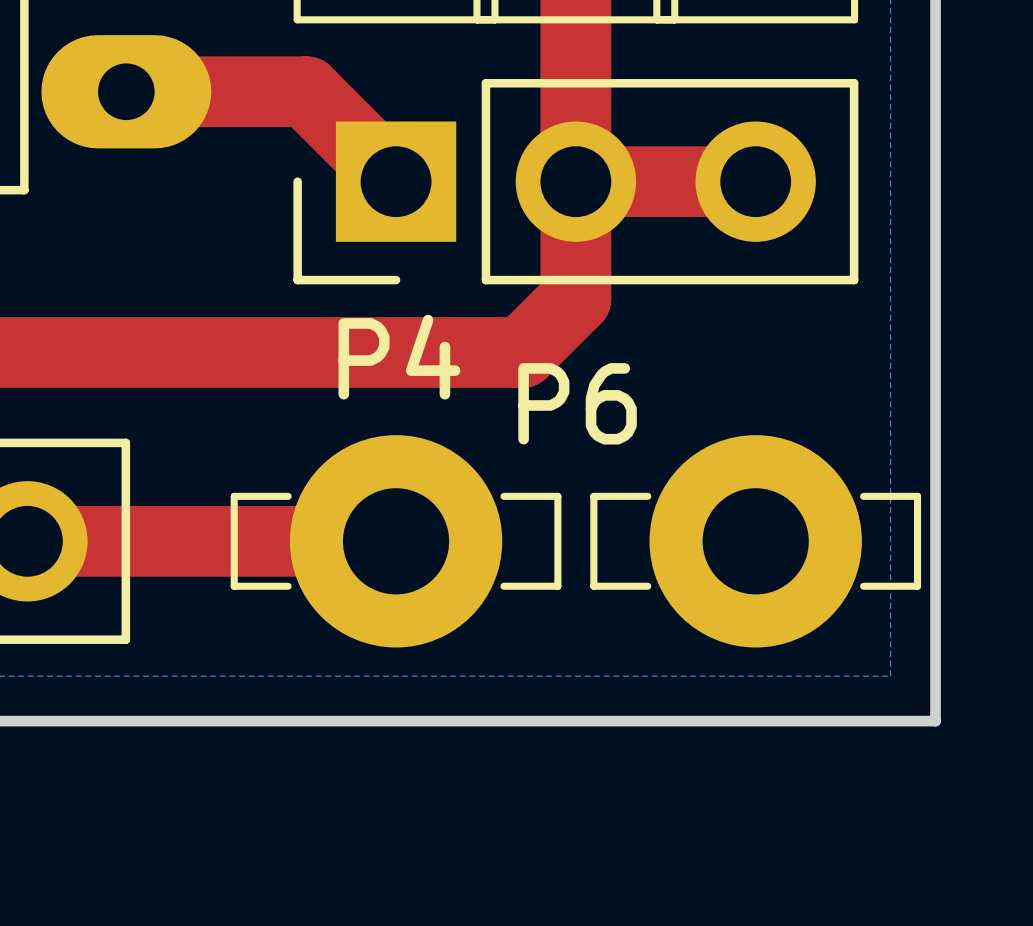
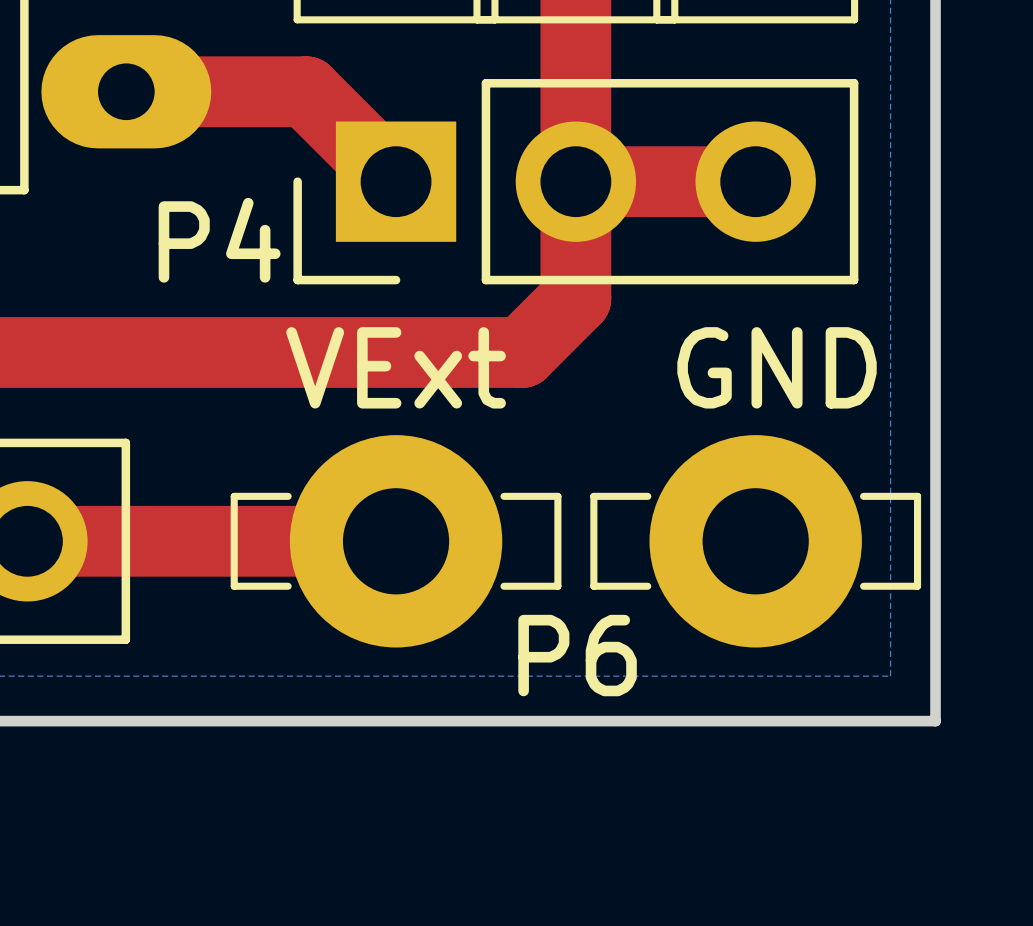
P4 name position: P4 (399, 357) -> P4 (219, 240)
text: none -> VExt GND (581, 367)
P6 name position: P6 (577, 403) -> P6 (577, 655)

